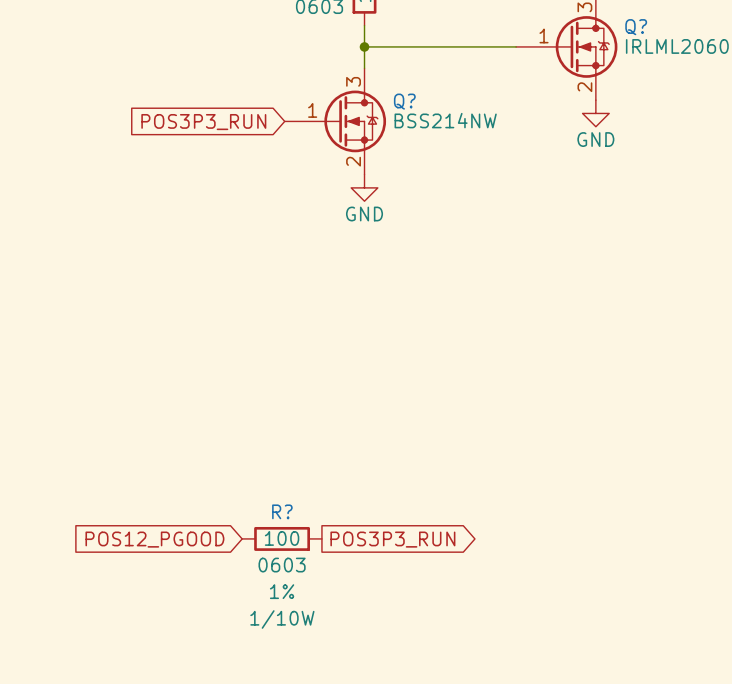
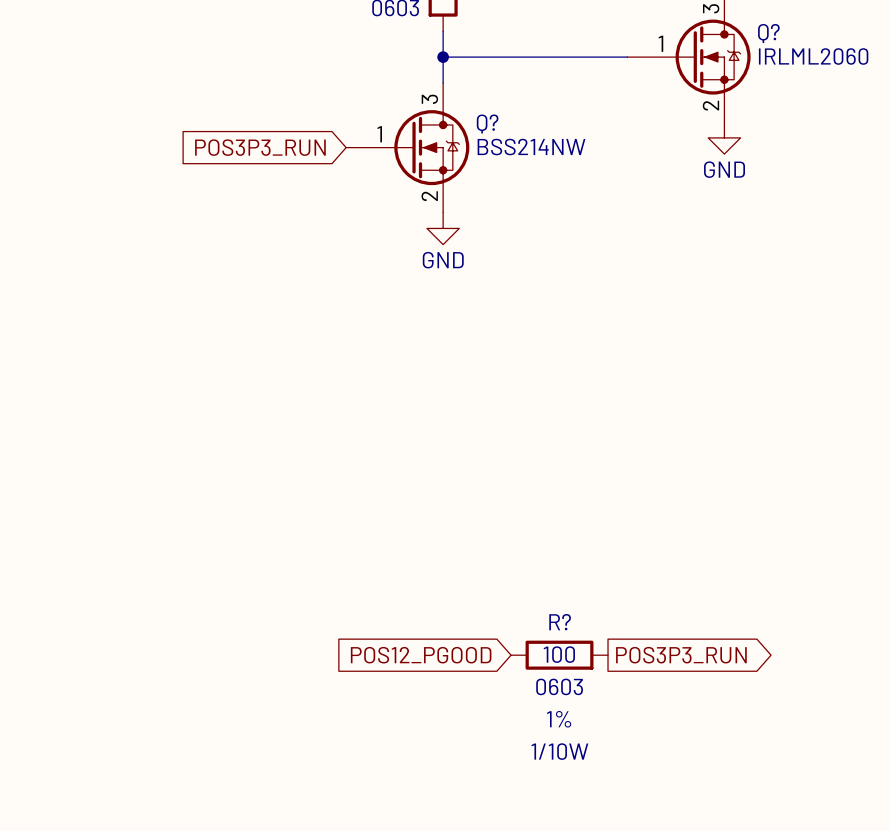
R? position: (282, 538) -> (559, 655)
global label position: POS12_PGOOD (154, 539) -> POS12_PGOOD (421, 655)
global label position: POS3P3_RUN (392, 539) -> POS3P3_RUN (681, 655)

